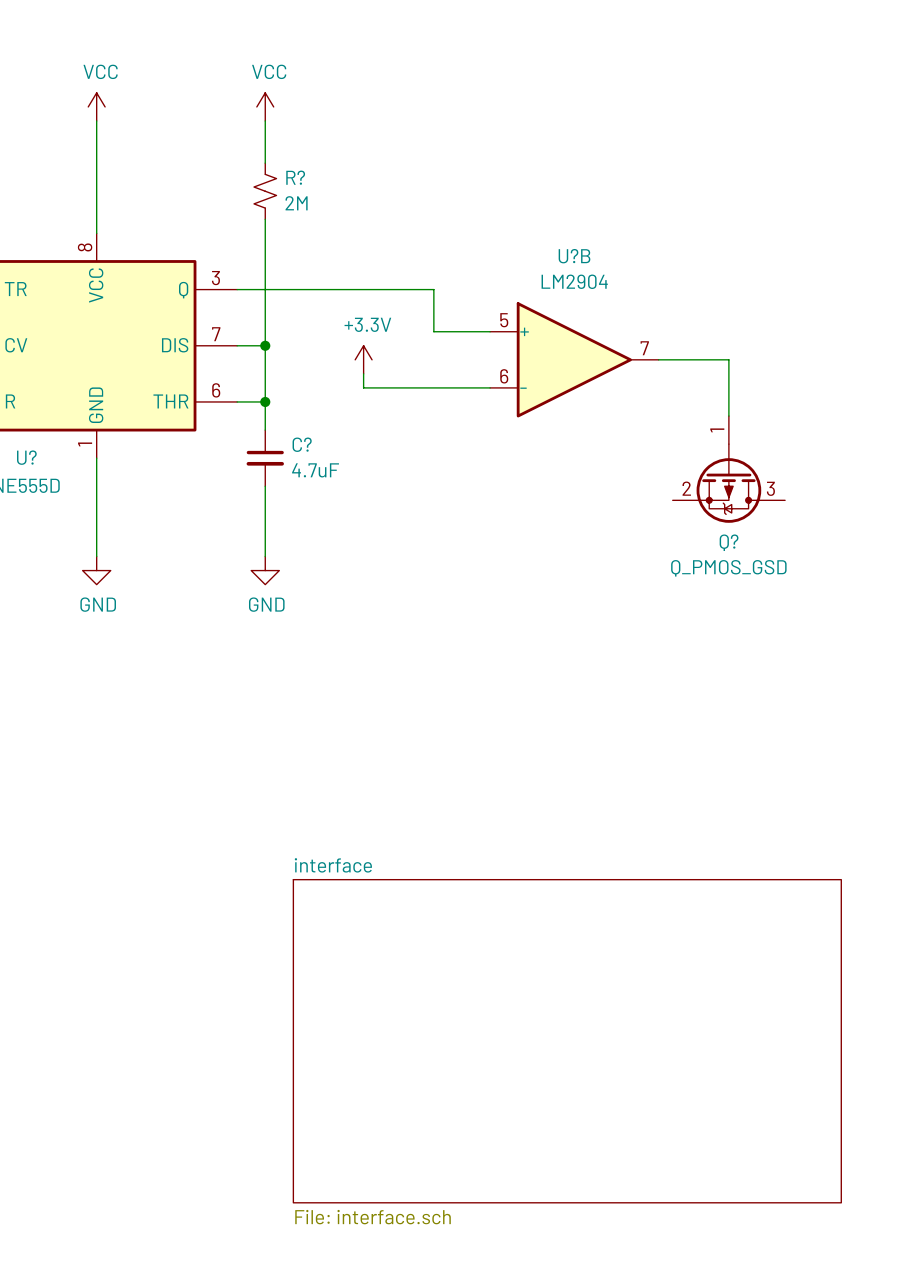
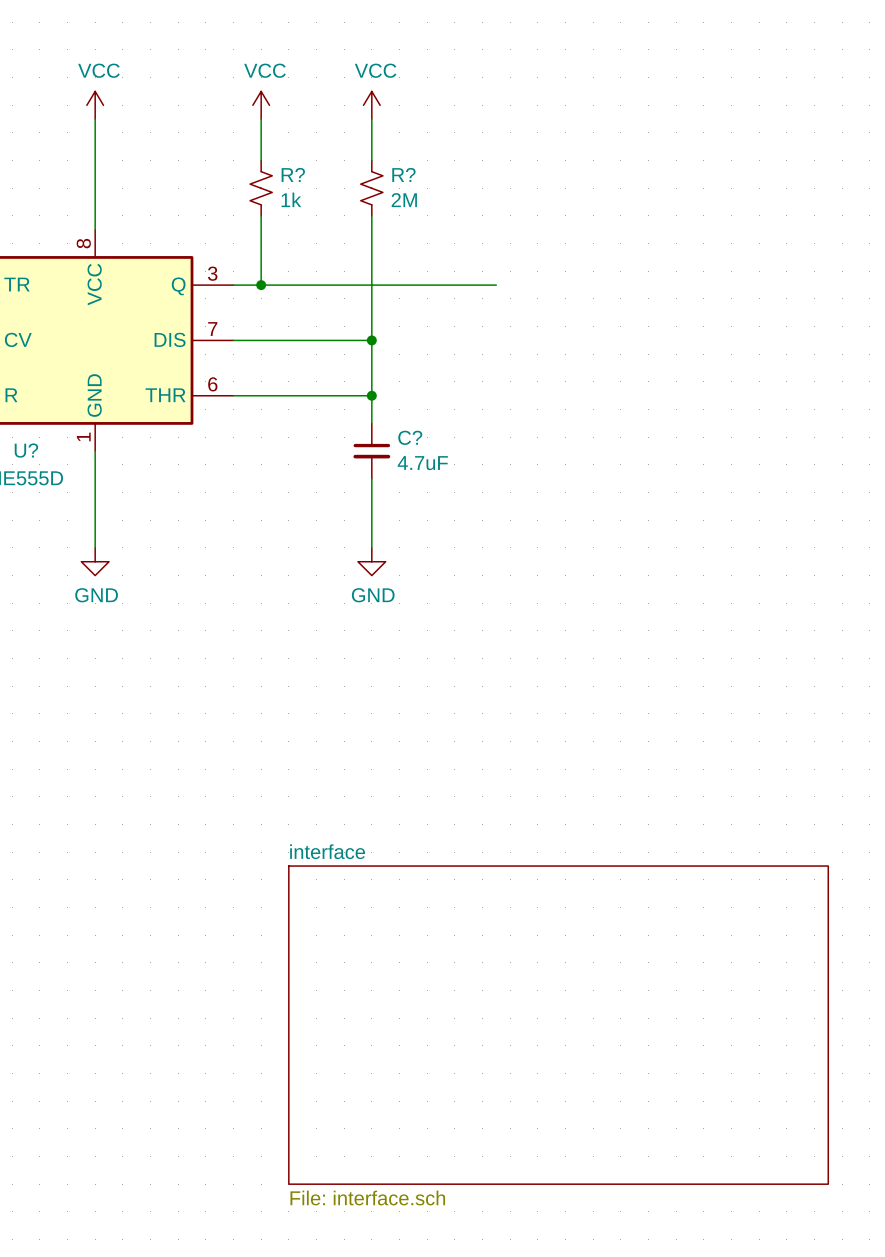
power symbol: none -> VCC (371, 105)
wire: none -> (371, 119) (371, 160)
R?: none -> 2M (371, 188)
R? value: 2M (296, 203) -> 1k (291, 199)
wire: none -> (371, 215) (371, 423)
wire: (265, 289) (265, 430) -> none
junction: none -> (261, 285)
wire: (433, 289) (433, 331) (490, 331) -> (427, 285) (496, 285)
wire: none -> (261, 340) (371, 340)
junction: (265, 345) -> none
junction: none -> (371, 340)
power symbol: +3.3V (363, 359) -> none
U?B: LM2904 (574, 359) -> none
wire: (658, 359) (728, 359) (728, 416) -> none
wire: (363, 373) (363, 387) (490, 387) -> none
wire: none -> (261, 395) (371, 395)
junction: (265, 401) -> none
junction: none -> (371, 395)
C? position: (265, 458) -> (371, 451)
Q?: Q_PMOS_GSD (728, 469) -> none
wire: (265, 486) (265, 556) -> (371, 478) (371, 547)
power symbol position: GND (265, 570) -> GND (371, 561)

